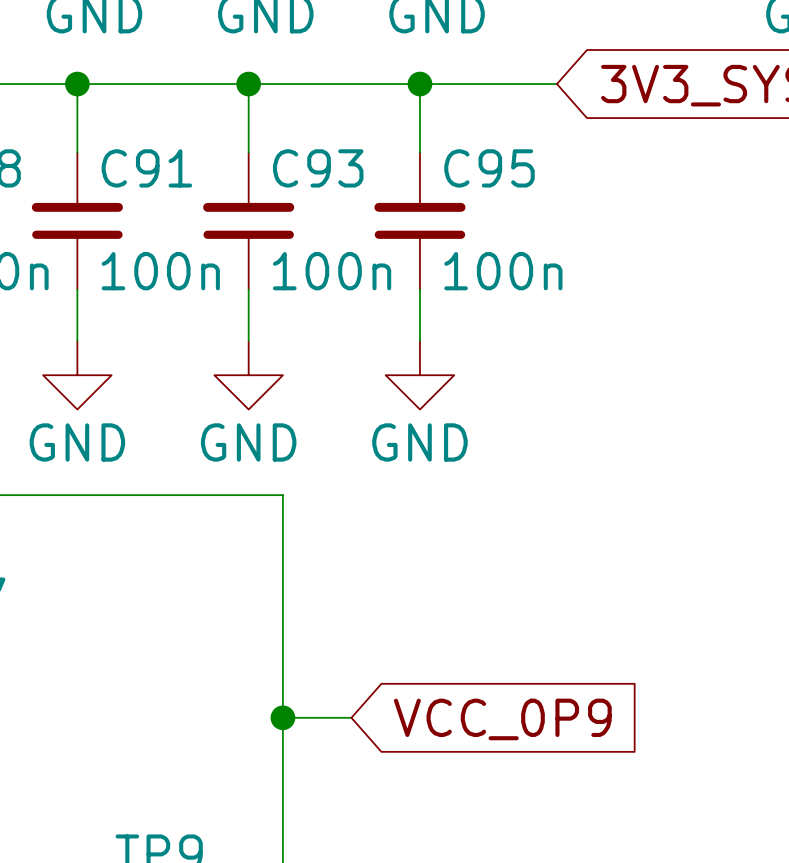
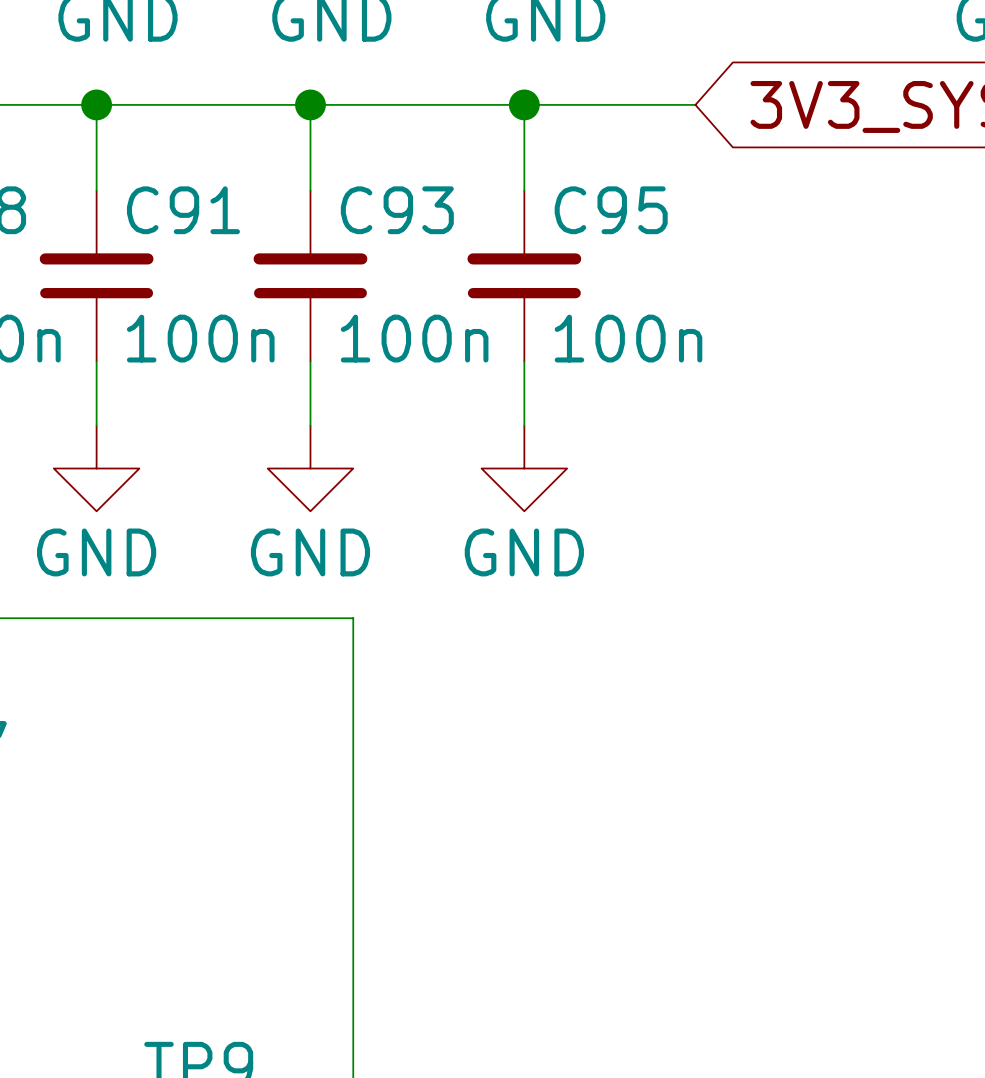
wire: (282, 717) (351, 717) -> none
junction: (282, 717) -> none
global label: VCC_0P9 (502, 719) -> none

